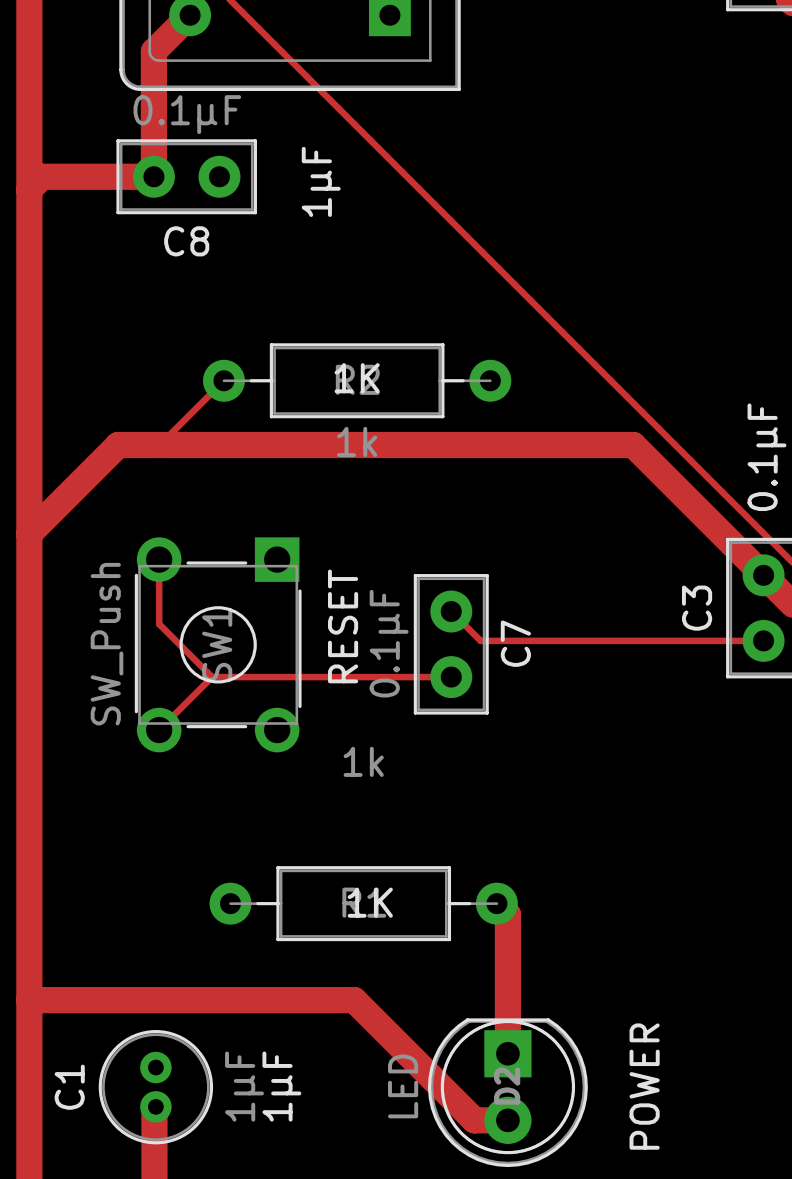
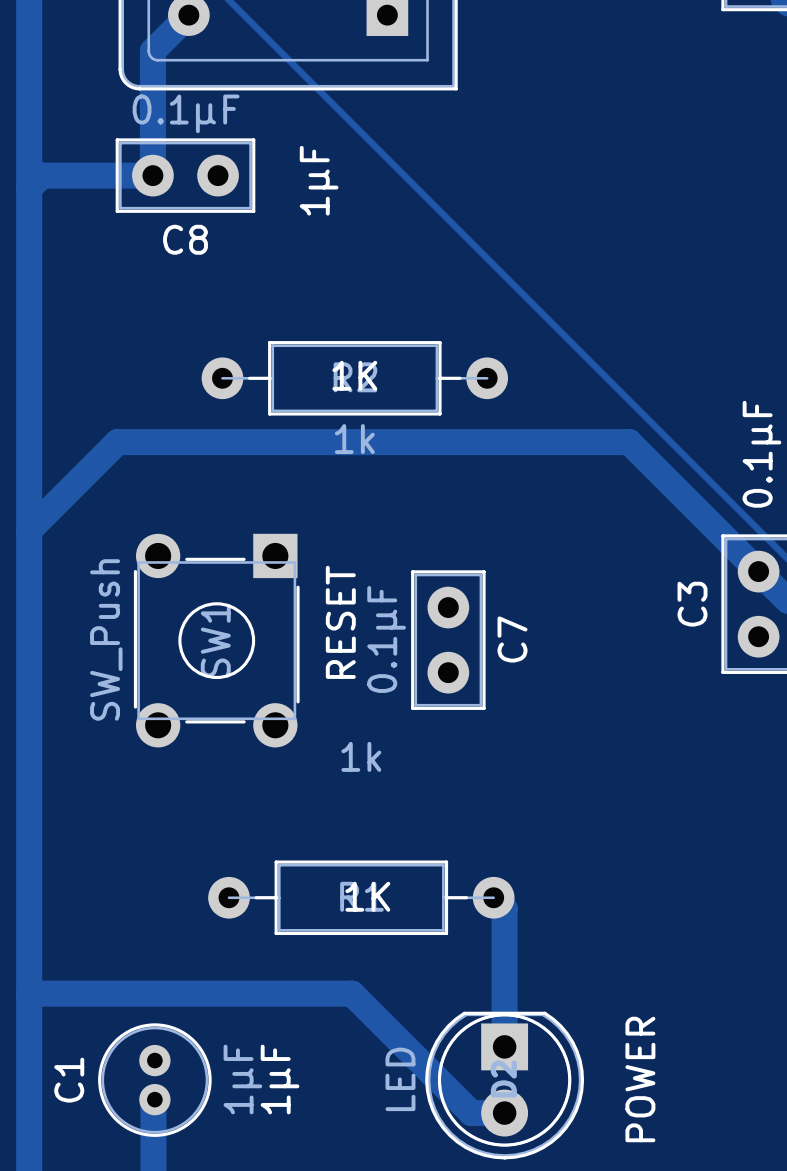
track: (223, 380) (160, 445) -> none
track: (159, 559) (159, 624) (212, 677) -> none
track: (451, 611) (480, 640) (763, 640) -> none
track: (212, 677) (159, 730) -> none
track: (212, 677) (451, 677) -> none

